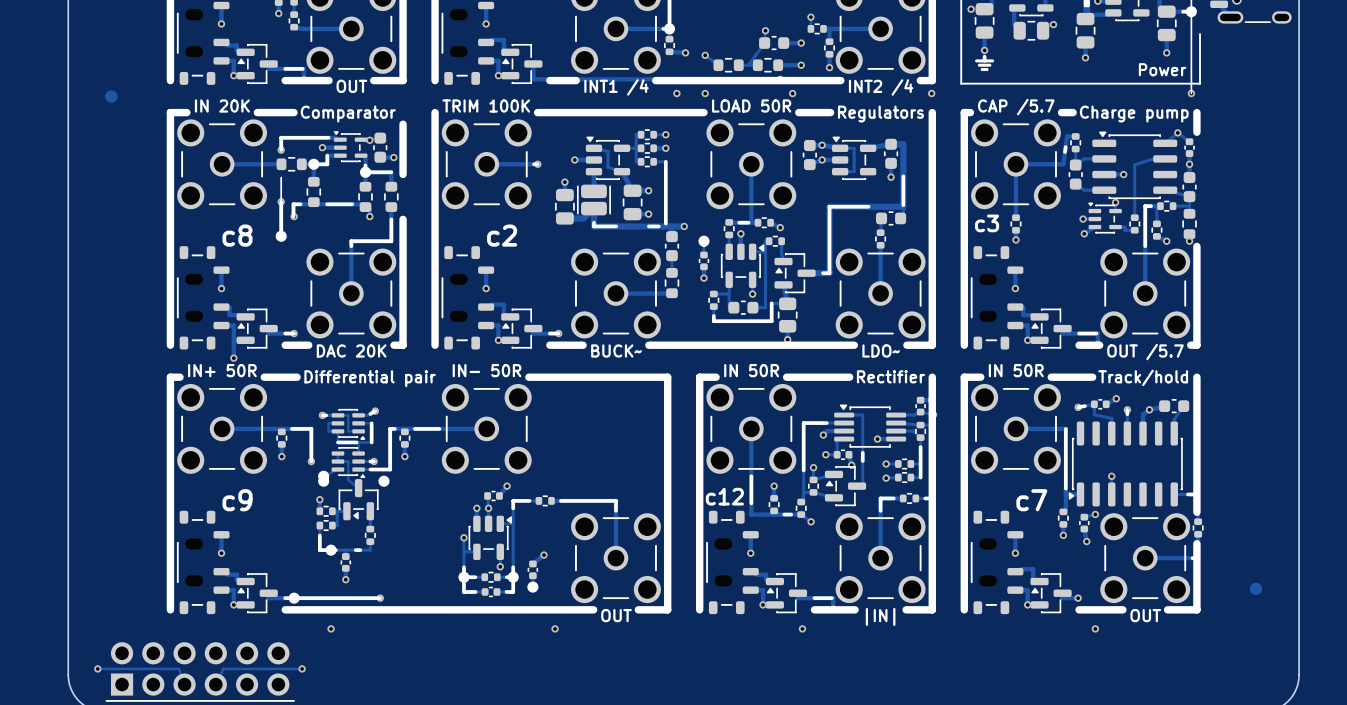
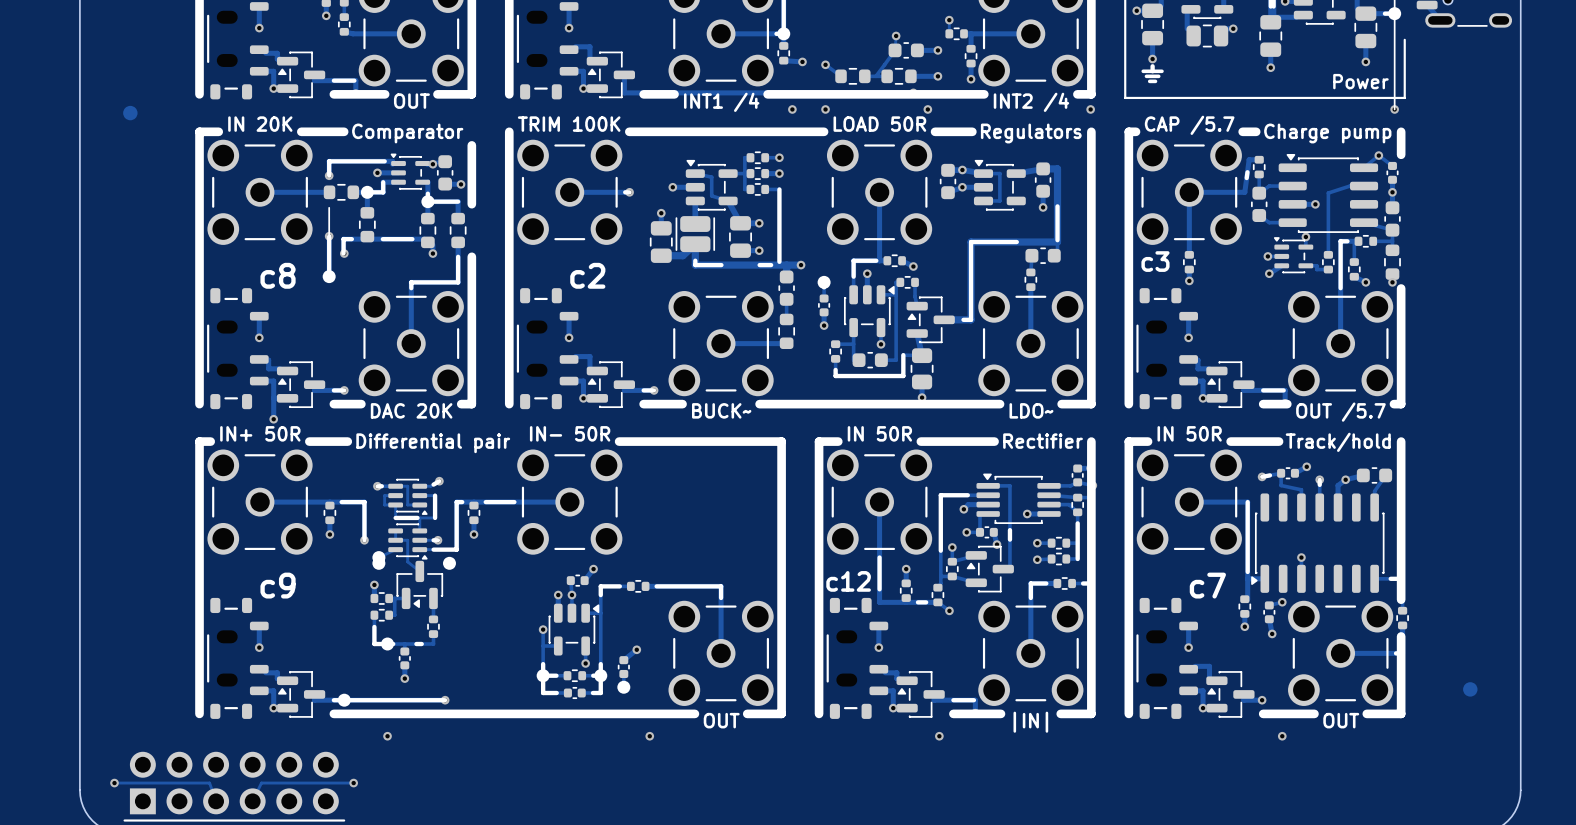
line: none -> (865, 260) (853, 260) (853, 276)
part: (729, 228) -> none

